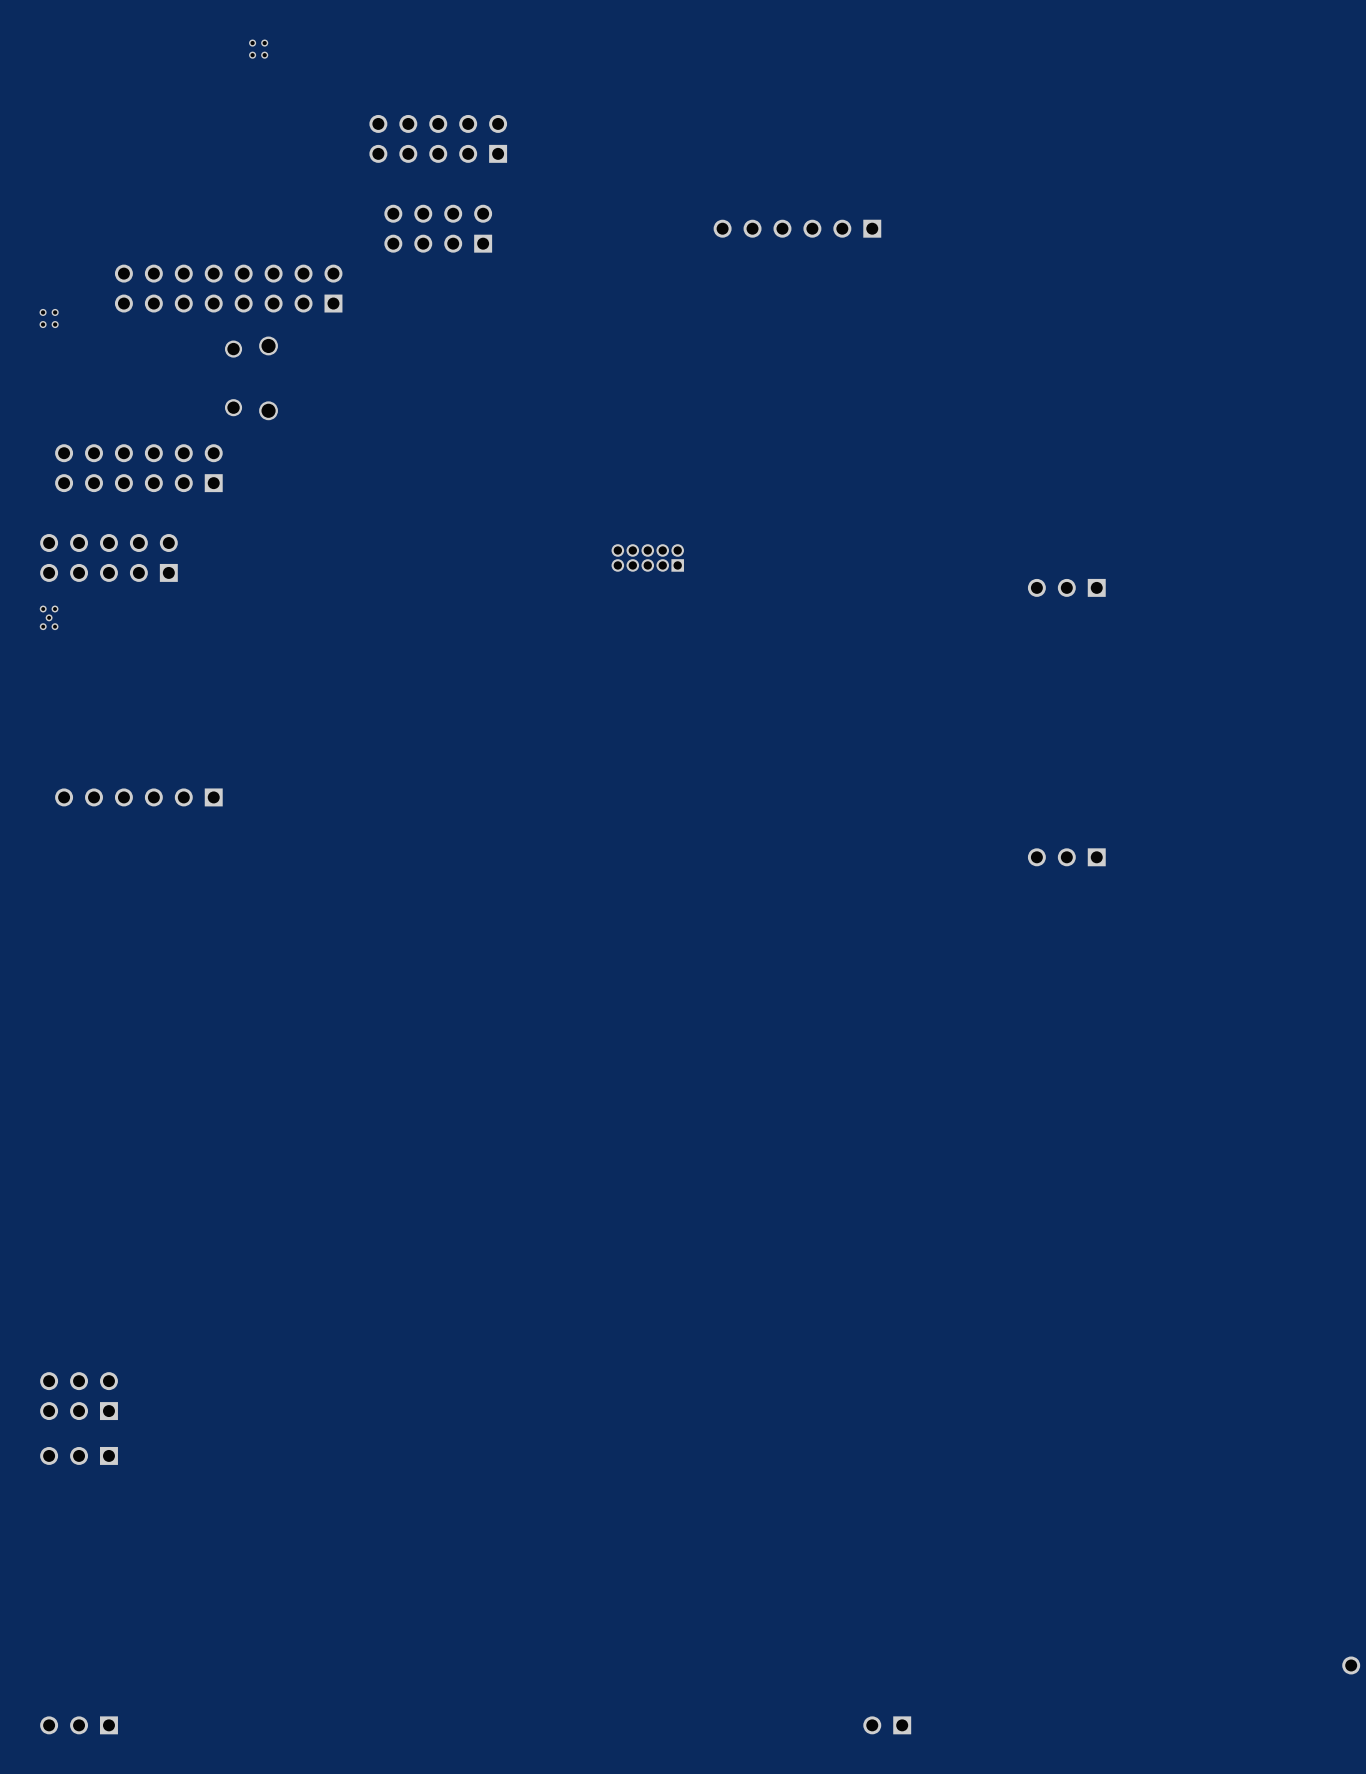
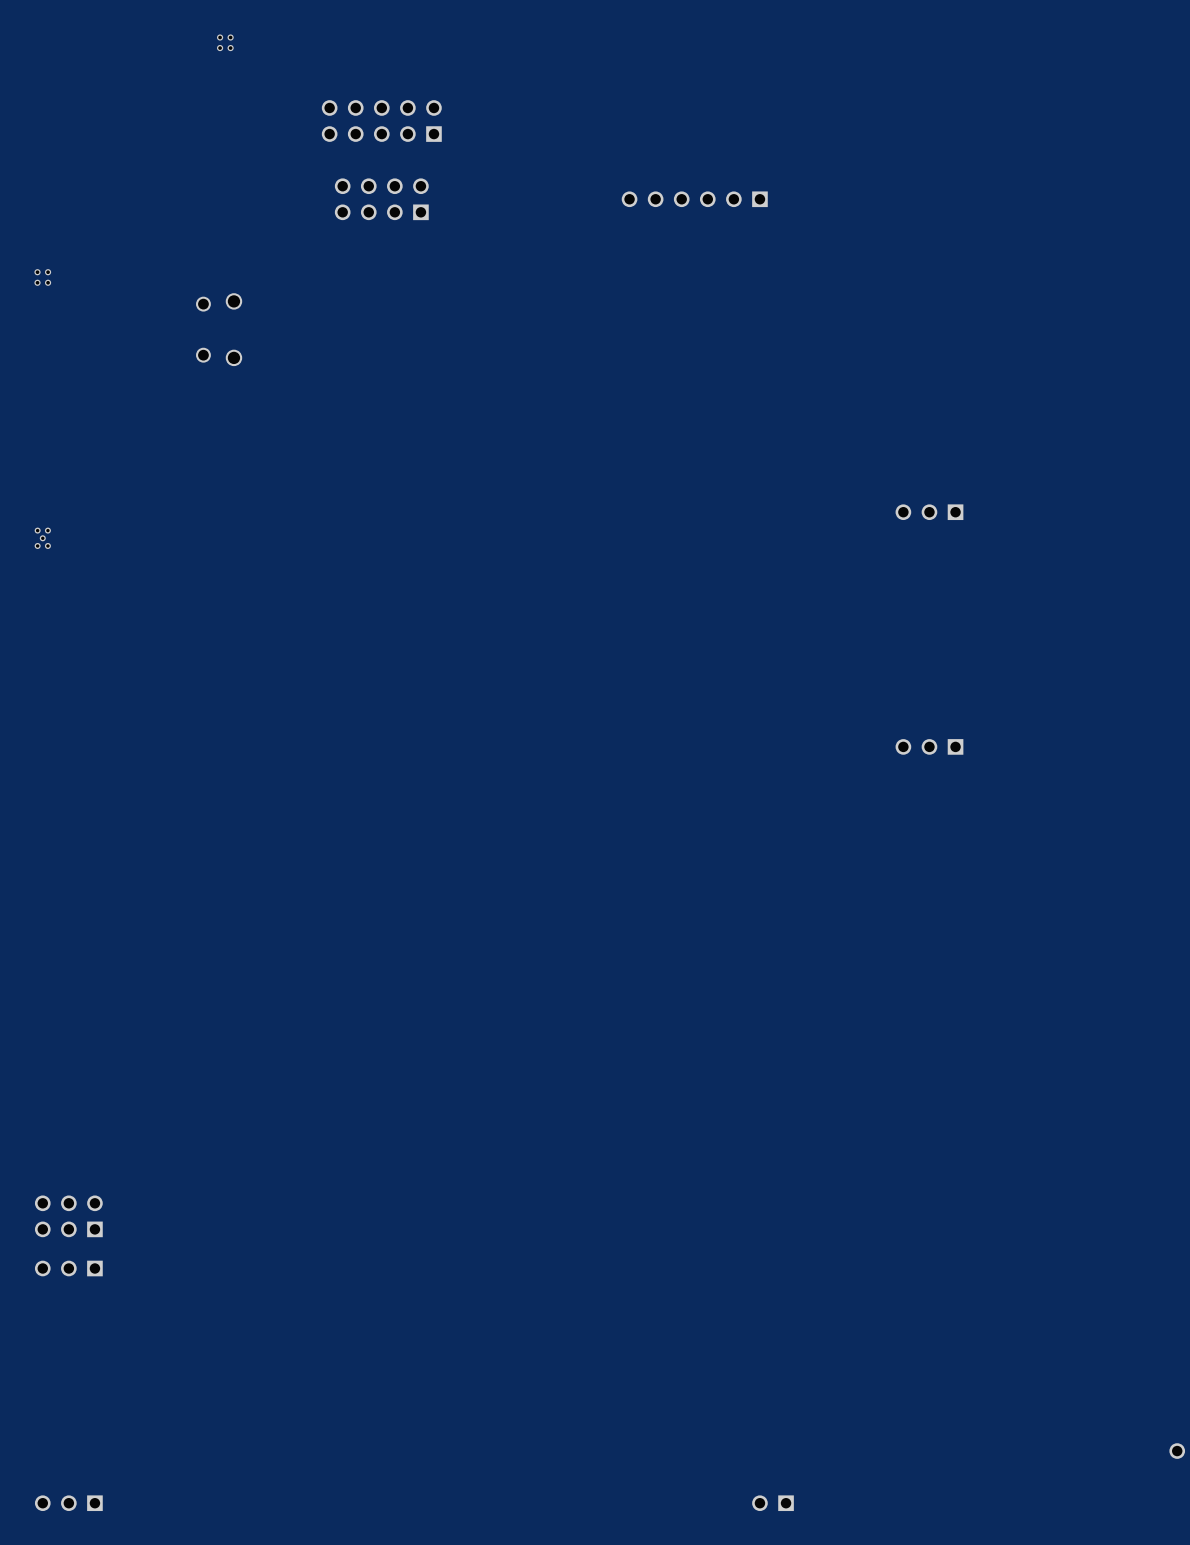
part: (228, 288) -> none
part: (138, 468) -> none
part: (108, 557) -> none
part: (647, 557) -> none
part: (138, 797) -> none

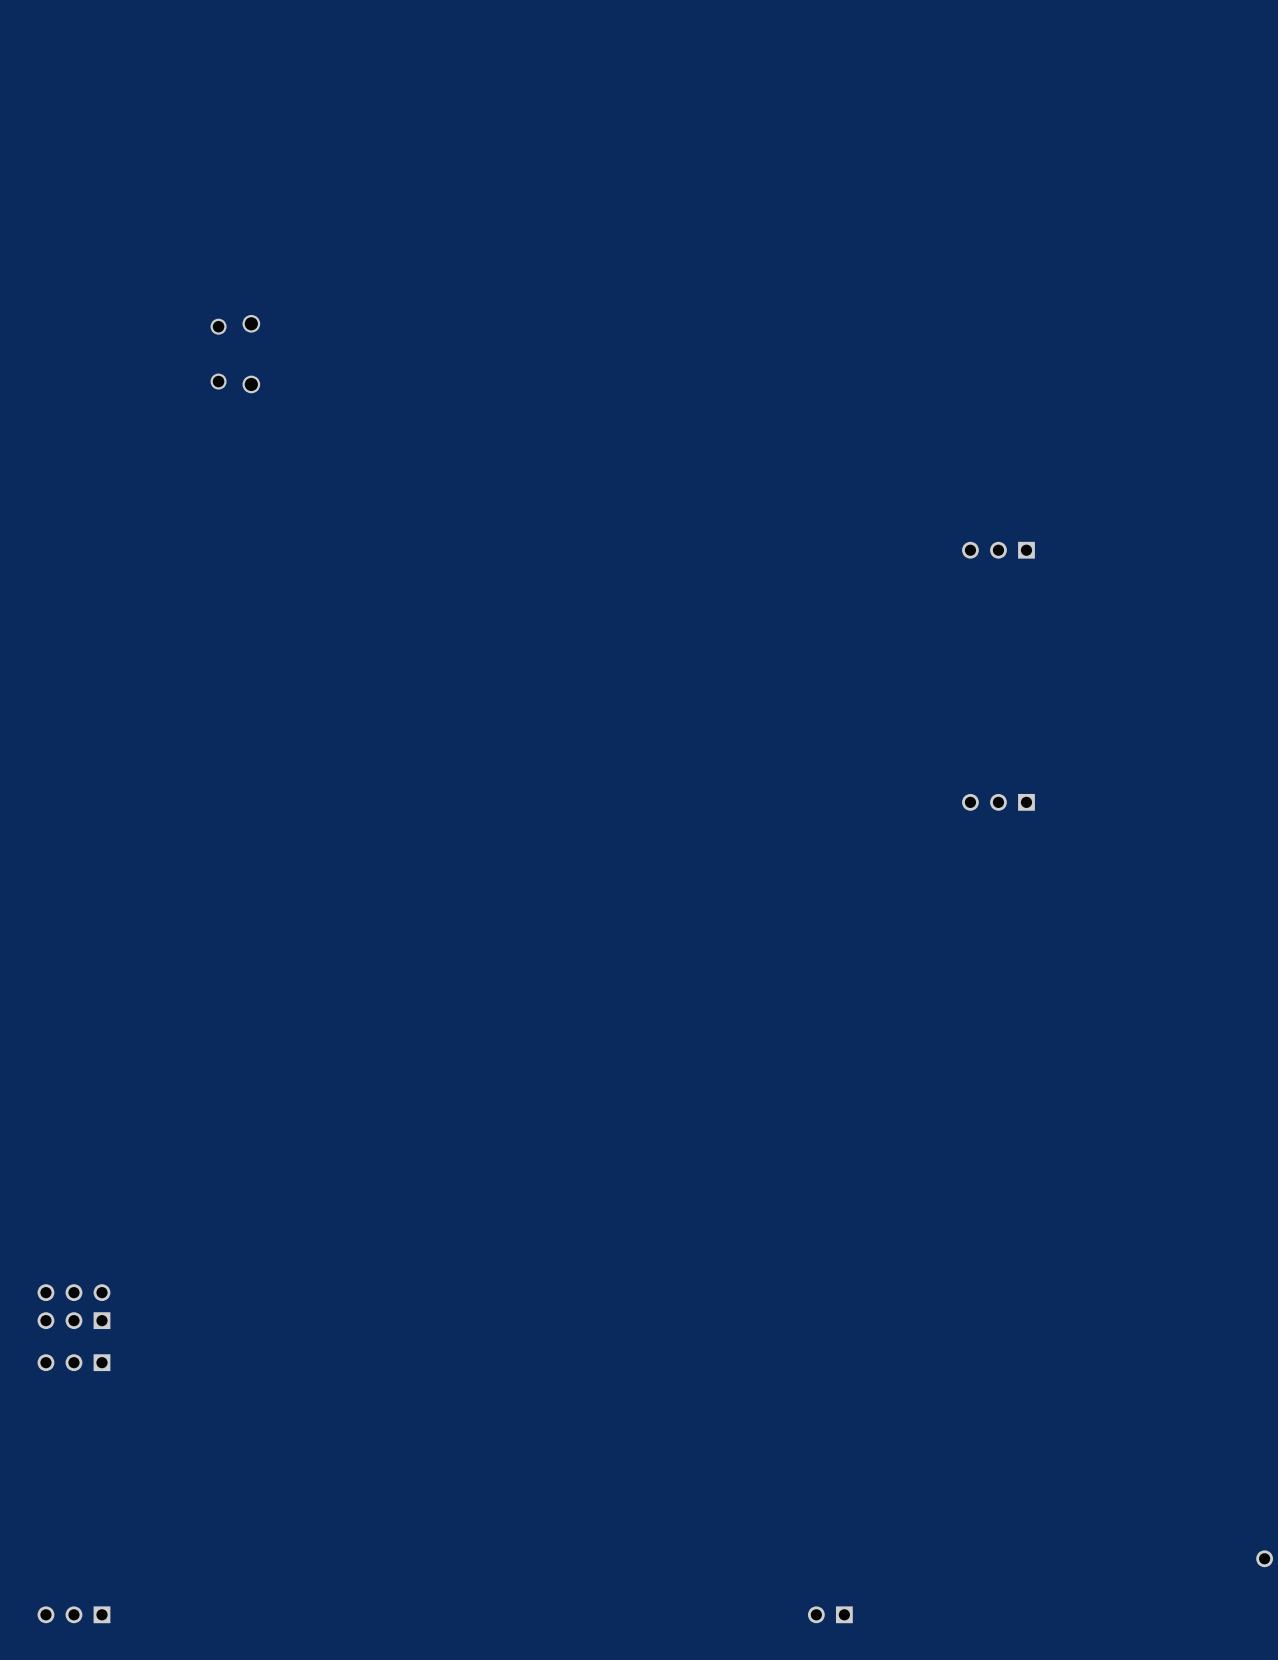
part: (225, 42) -> none
part: (381, 121) -> none
part: (381, 199) -> none
part: (694, 199) -> none
part: (42, 277) -> none
part: (42, 538) -> none

